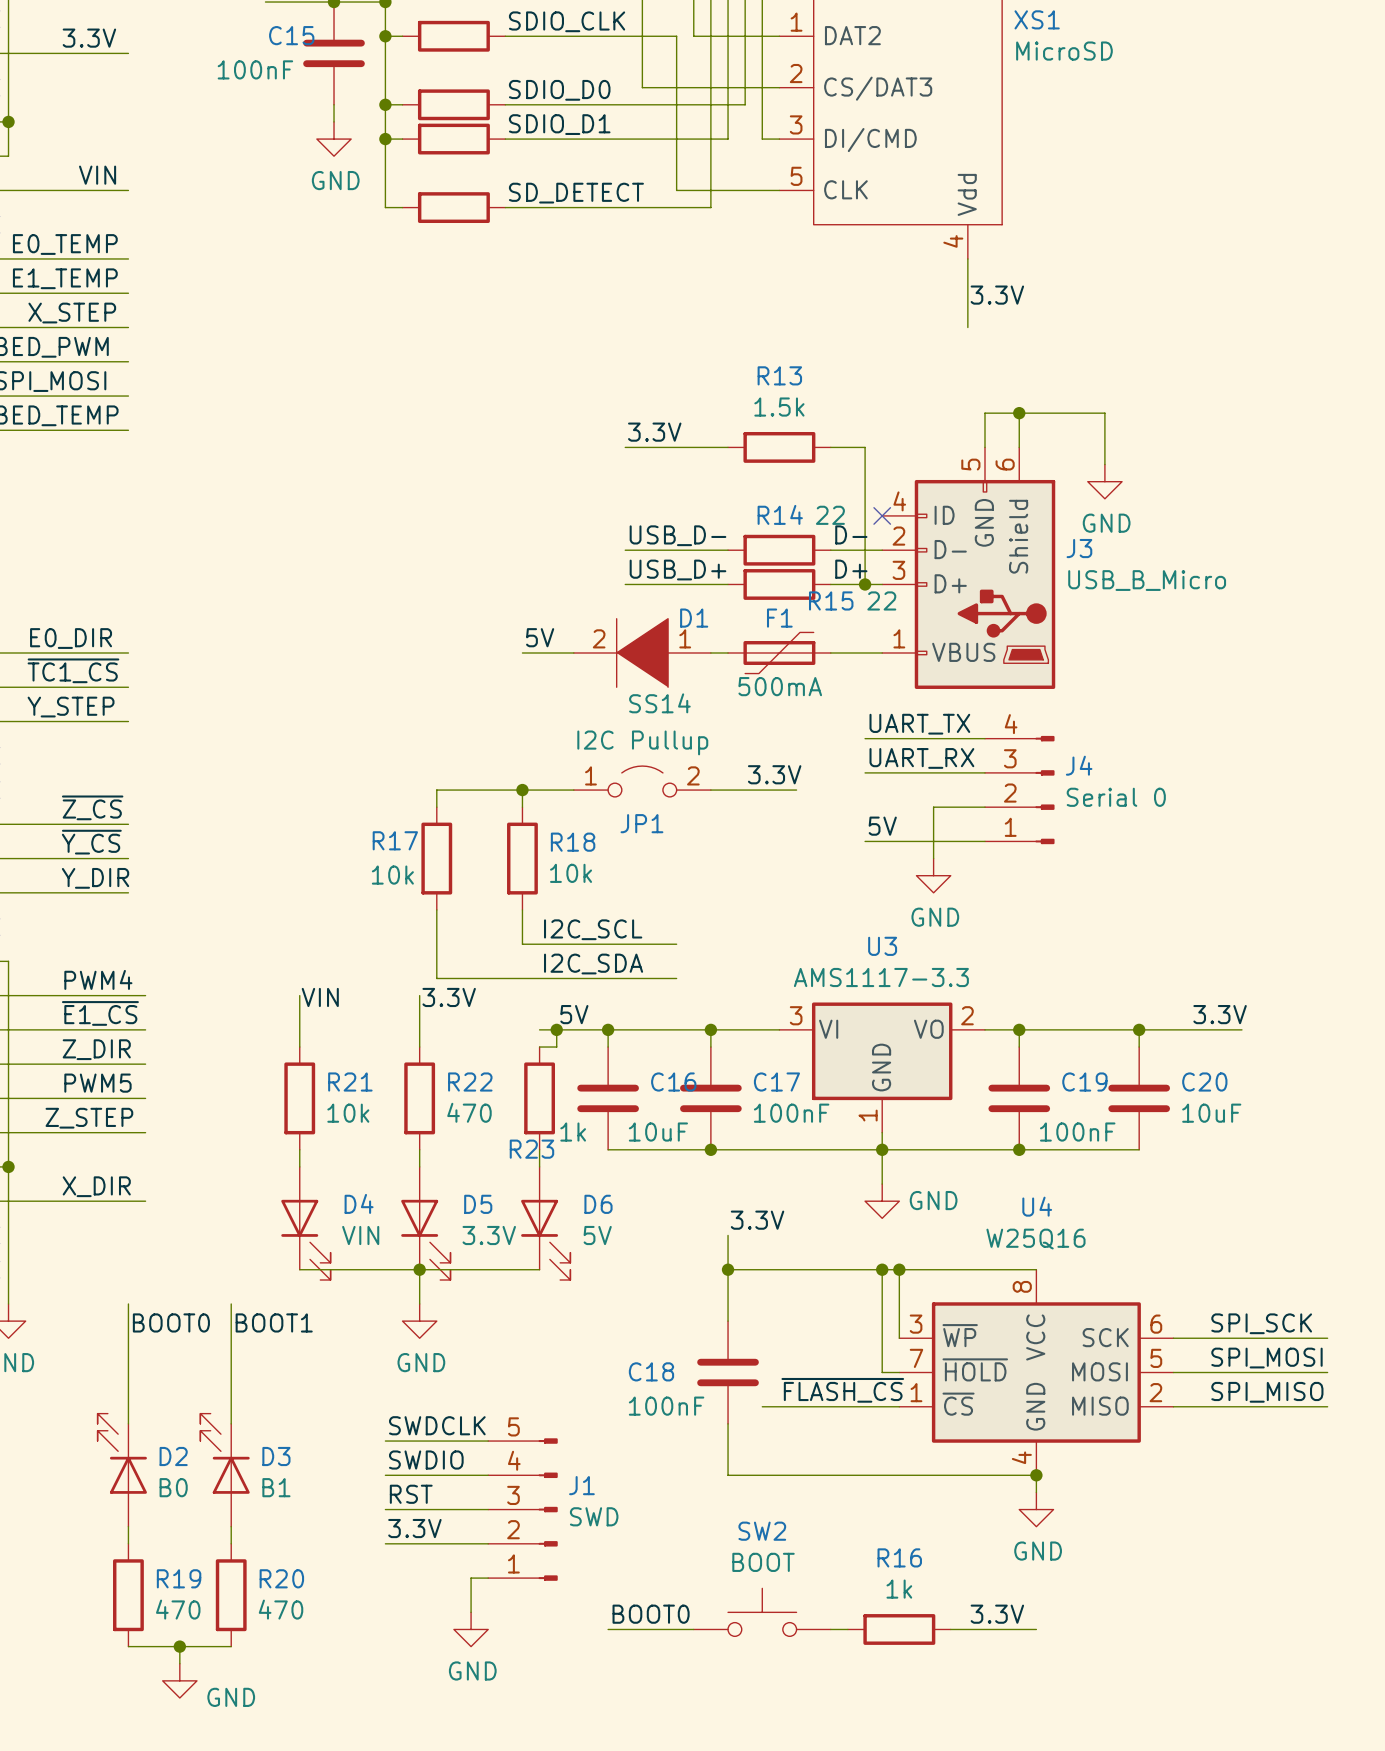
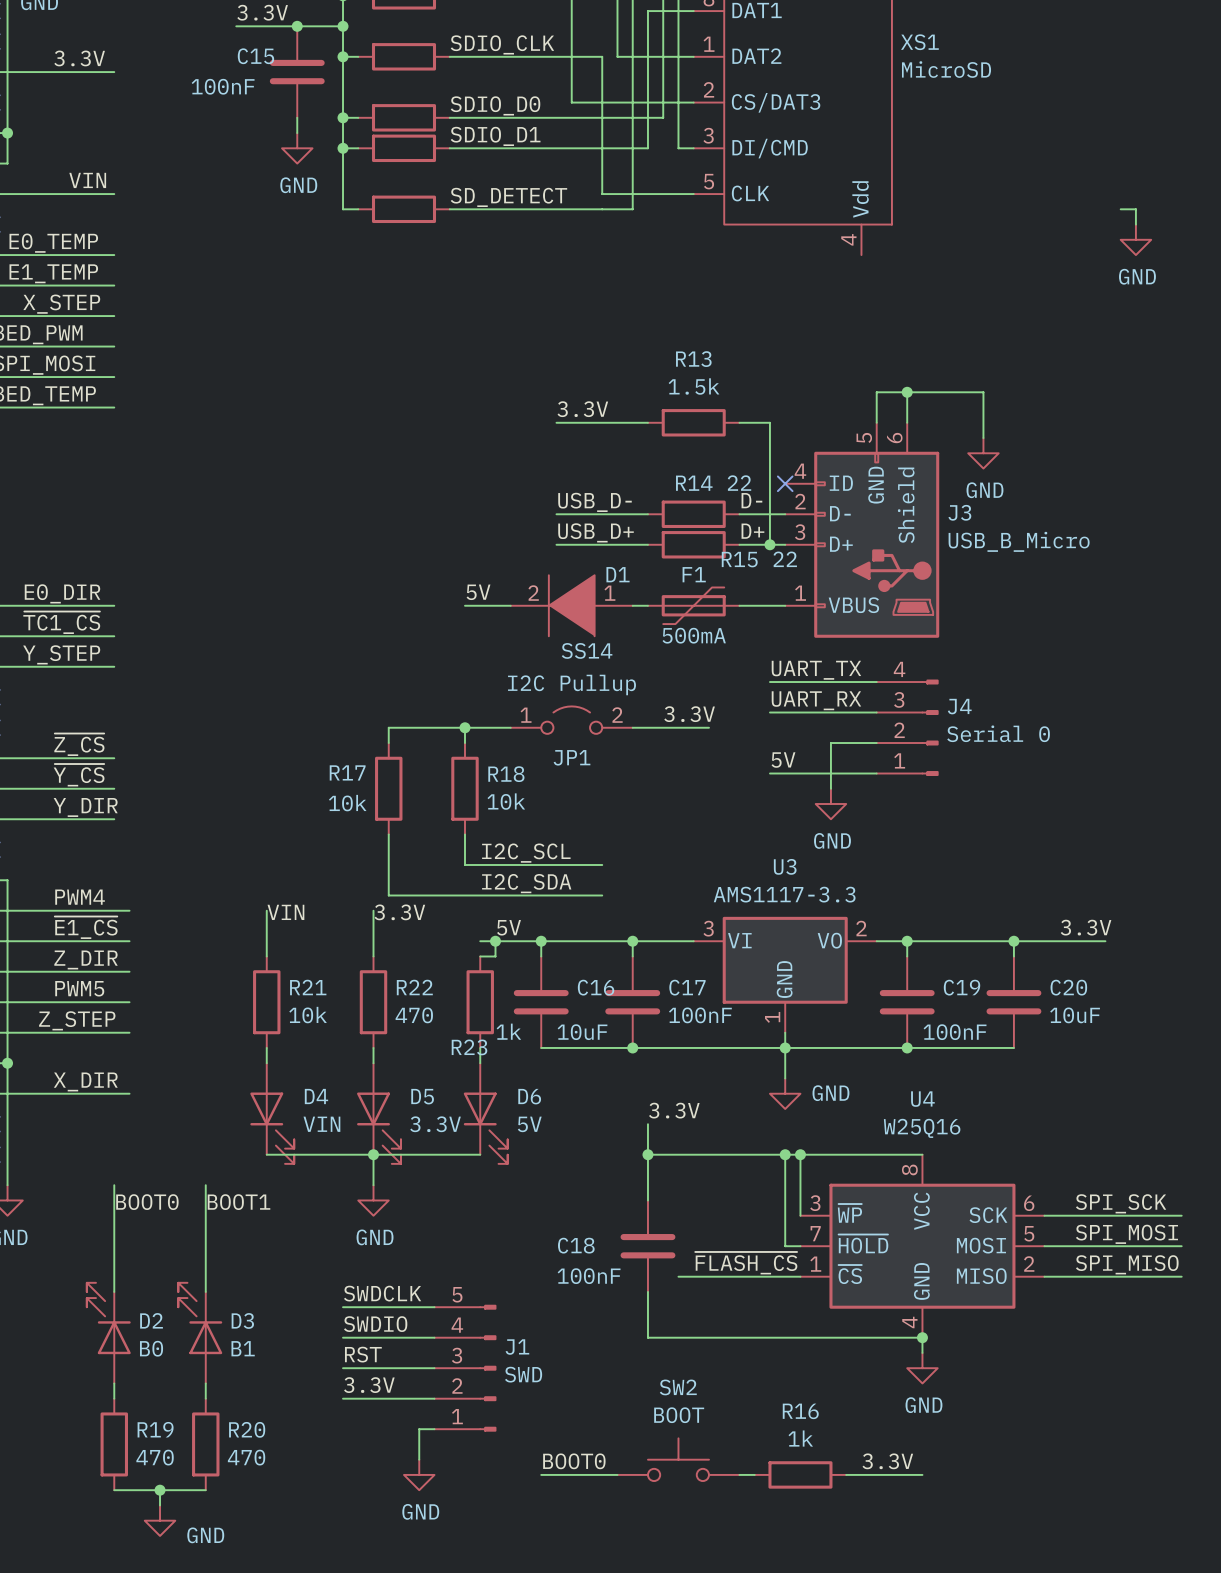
wire: none -> (1120, 209) (1135, 209) (1135, 224)
power symbol: none -> GND (1135, 239)
wire: (967, 258) (967, 327) -> none
label: 3.3V (997, 295) -> none

